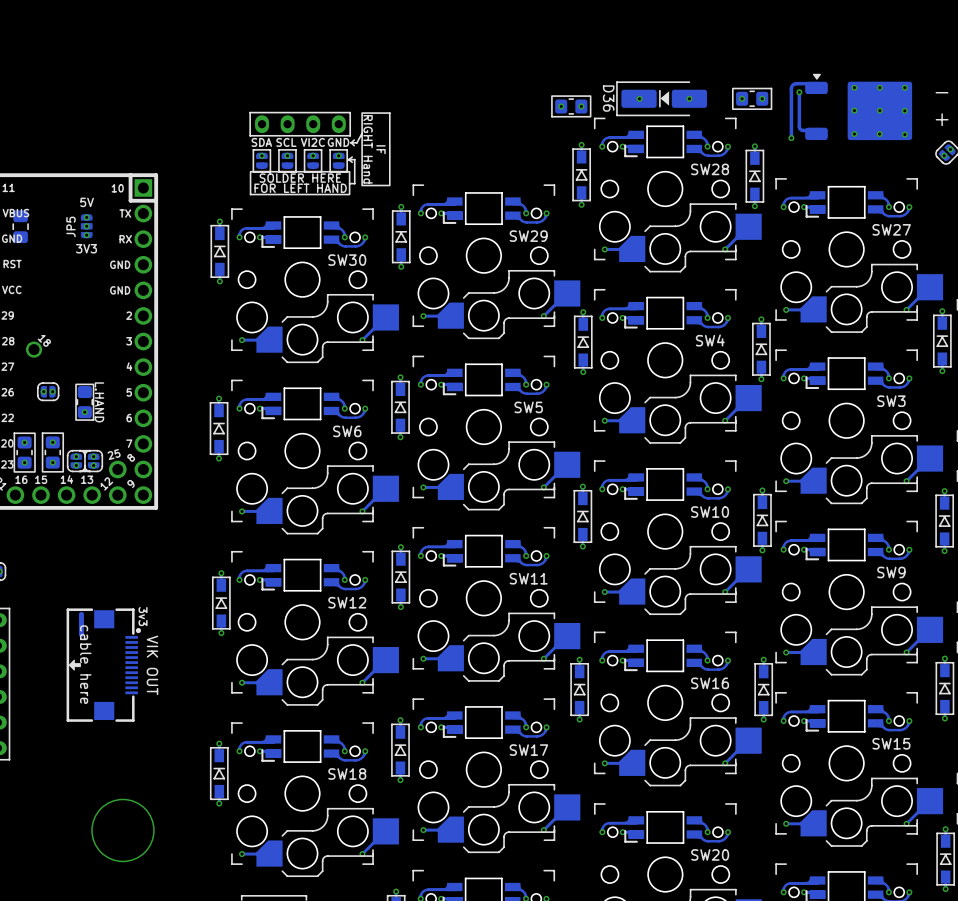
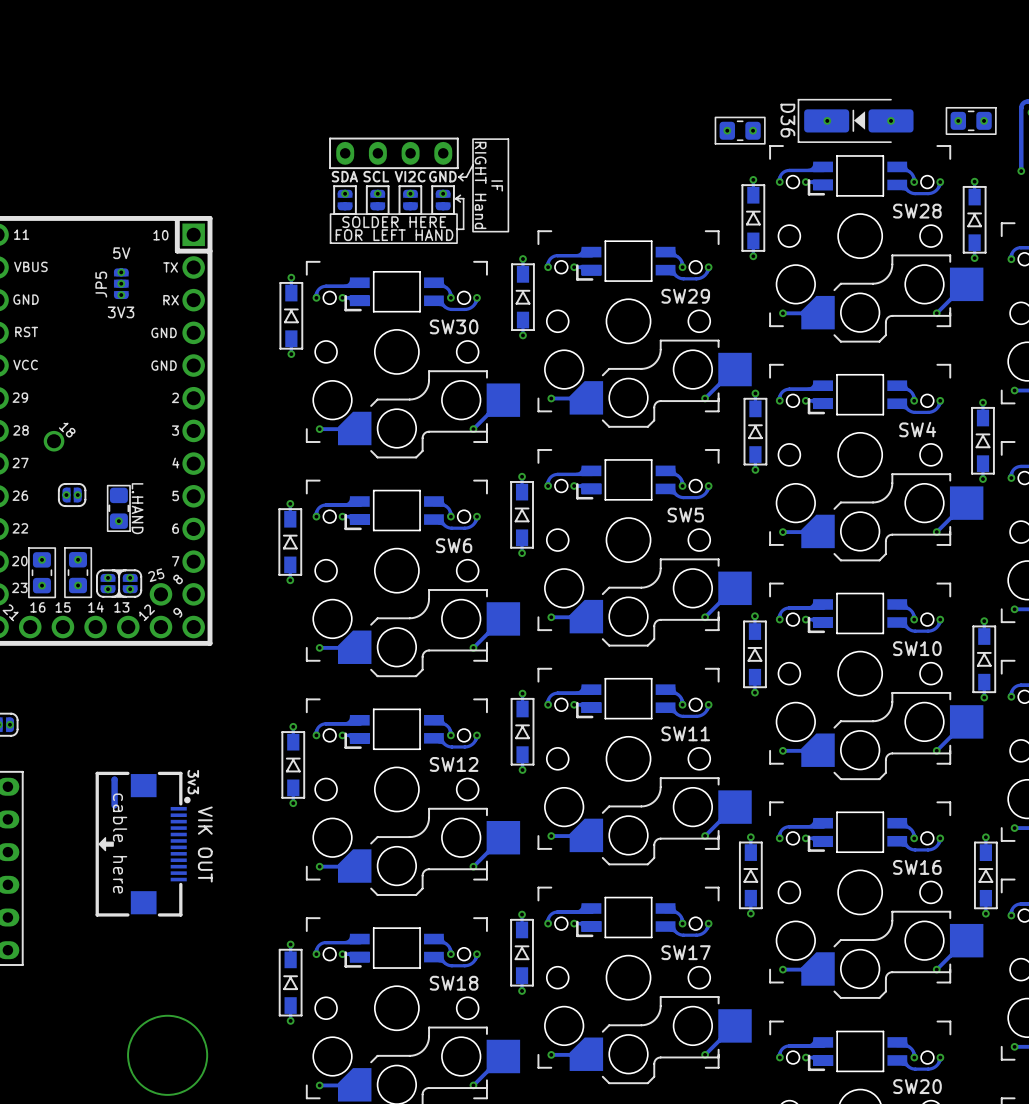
part: (20, 226) -> none

